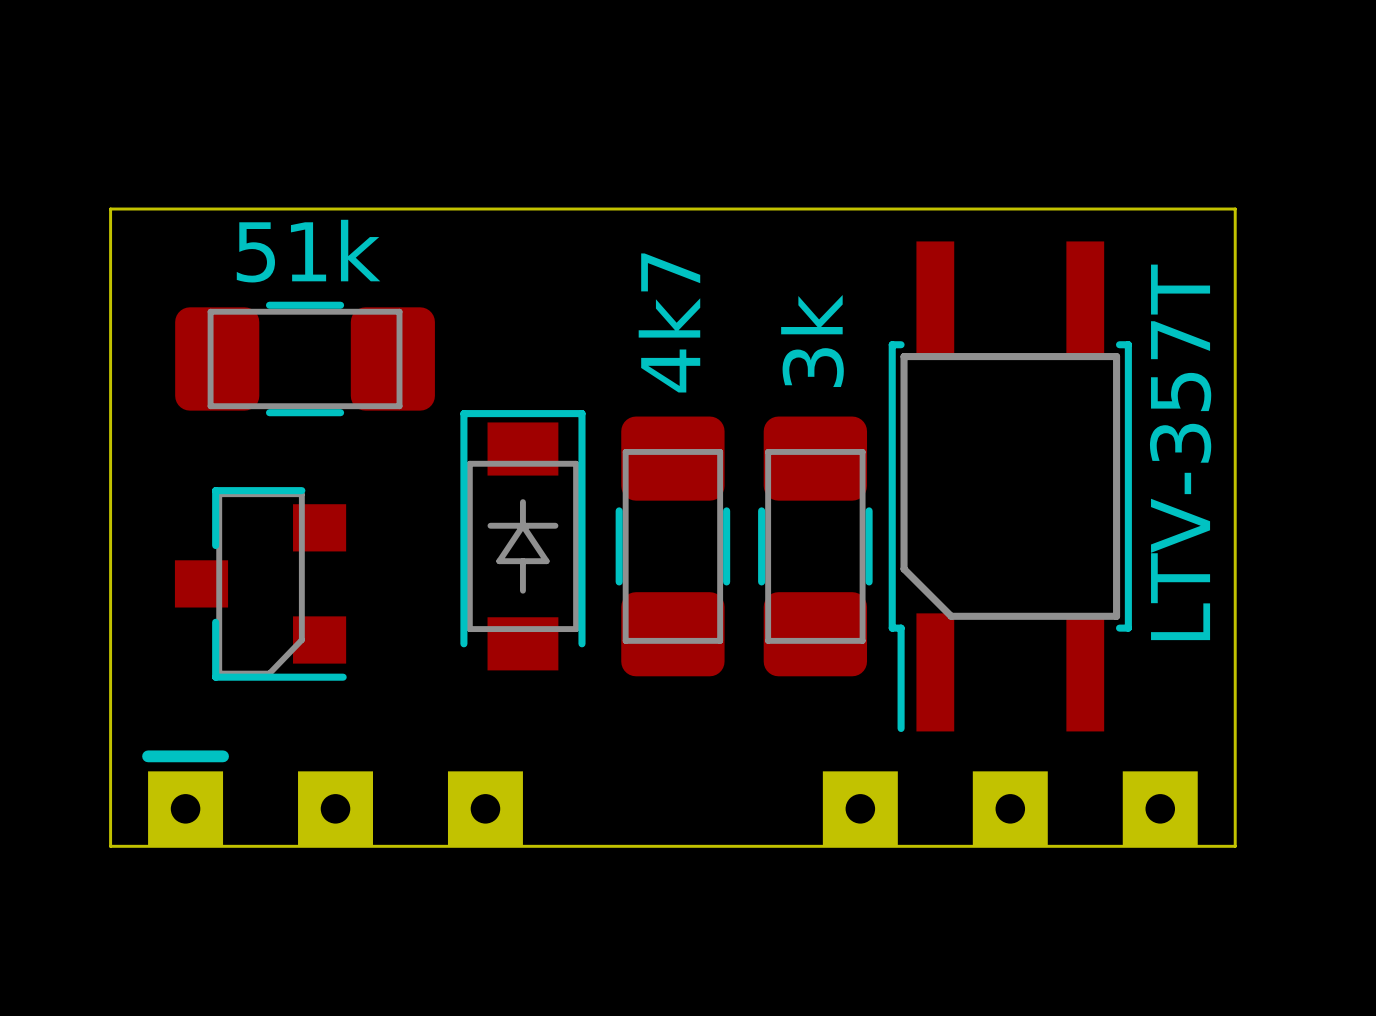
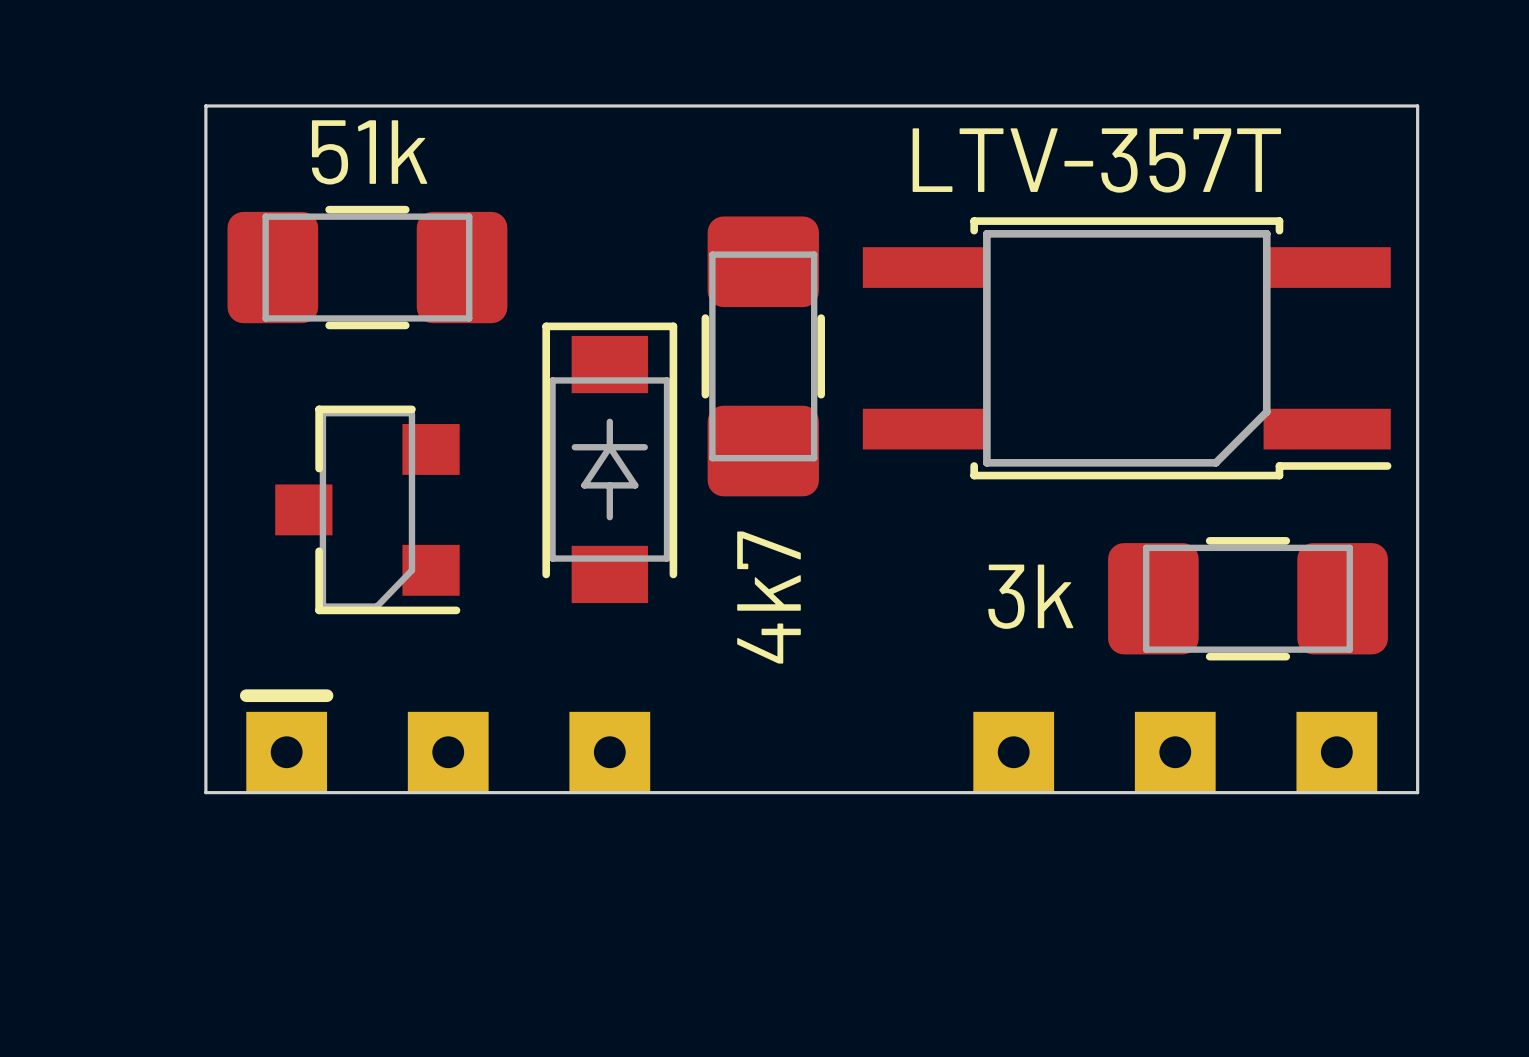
part value position: 4k7 (669, 322) -> 4k7 (768, 597)
part value position: 3k (812, 341) -> 3k (1030, 596)
part position: (305, 358) -> (367, 267)
part rotation: 0° (1010, 486) -> 90° counterclockwise (1127, 348)
part position: (522, 540) -> (609, 462)
part position: (672, 546) -> (763, 356)
part rotation: 0° (815, 546) -> 90° clockwise (1247, 598)
part position: (815, 546) -> (1247, 598)

